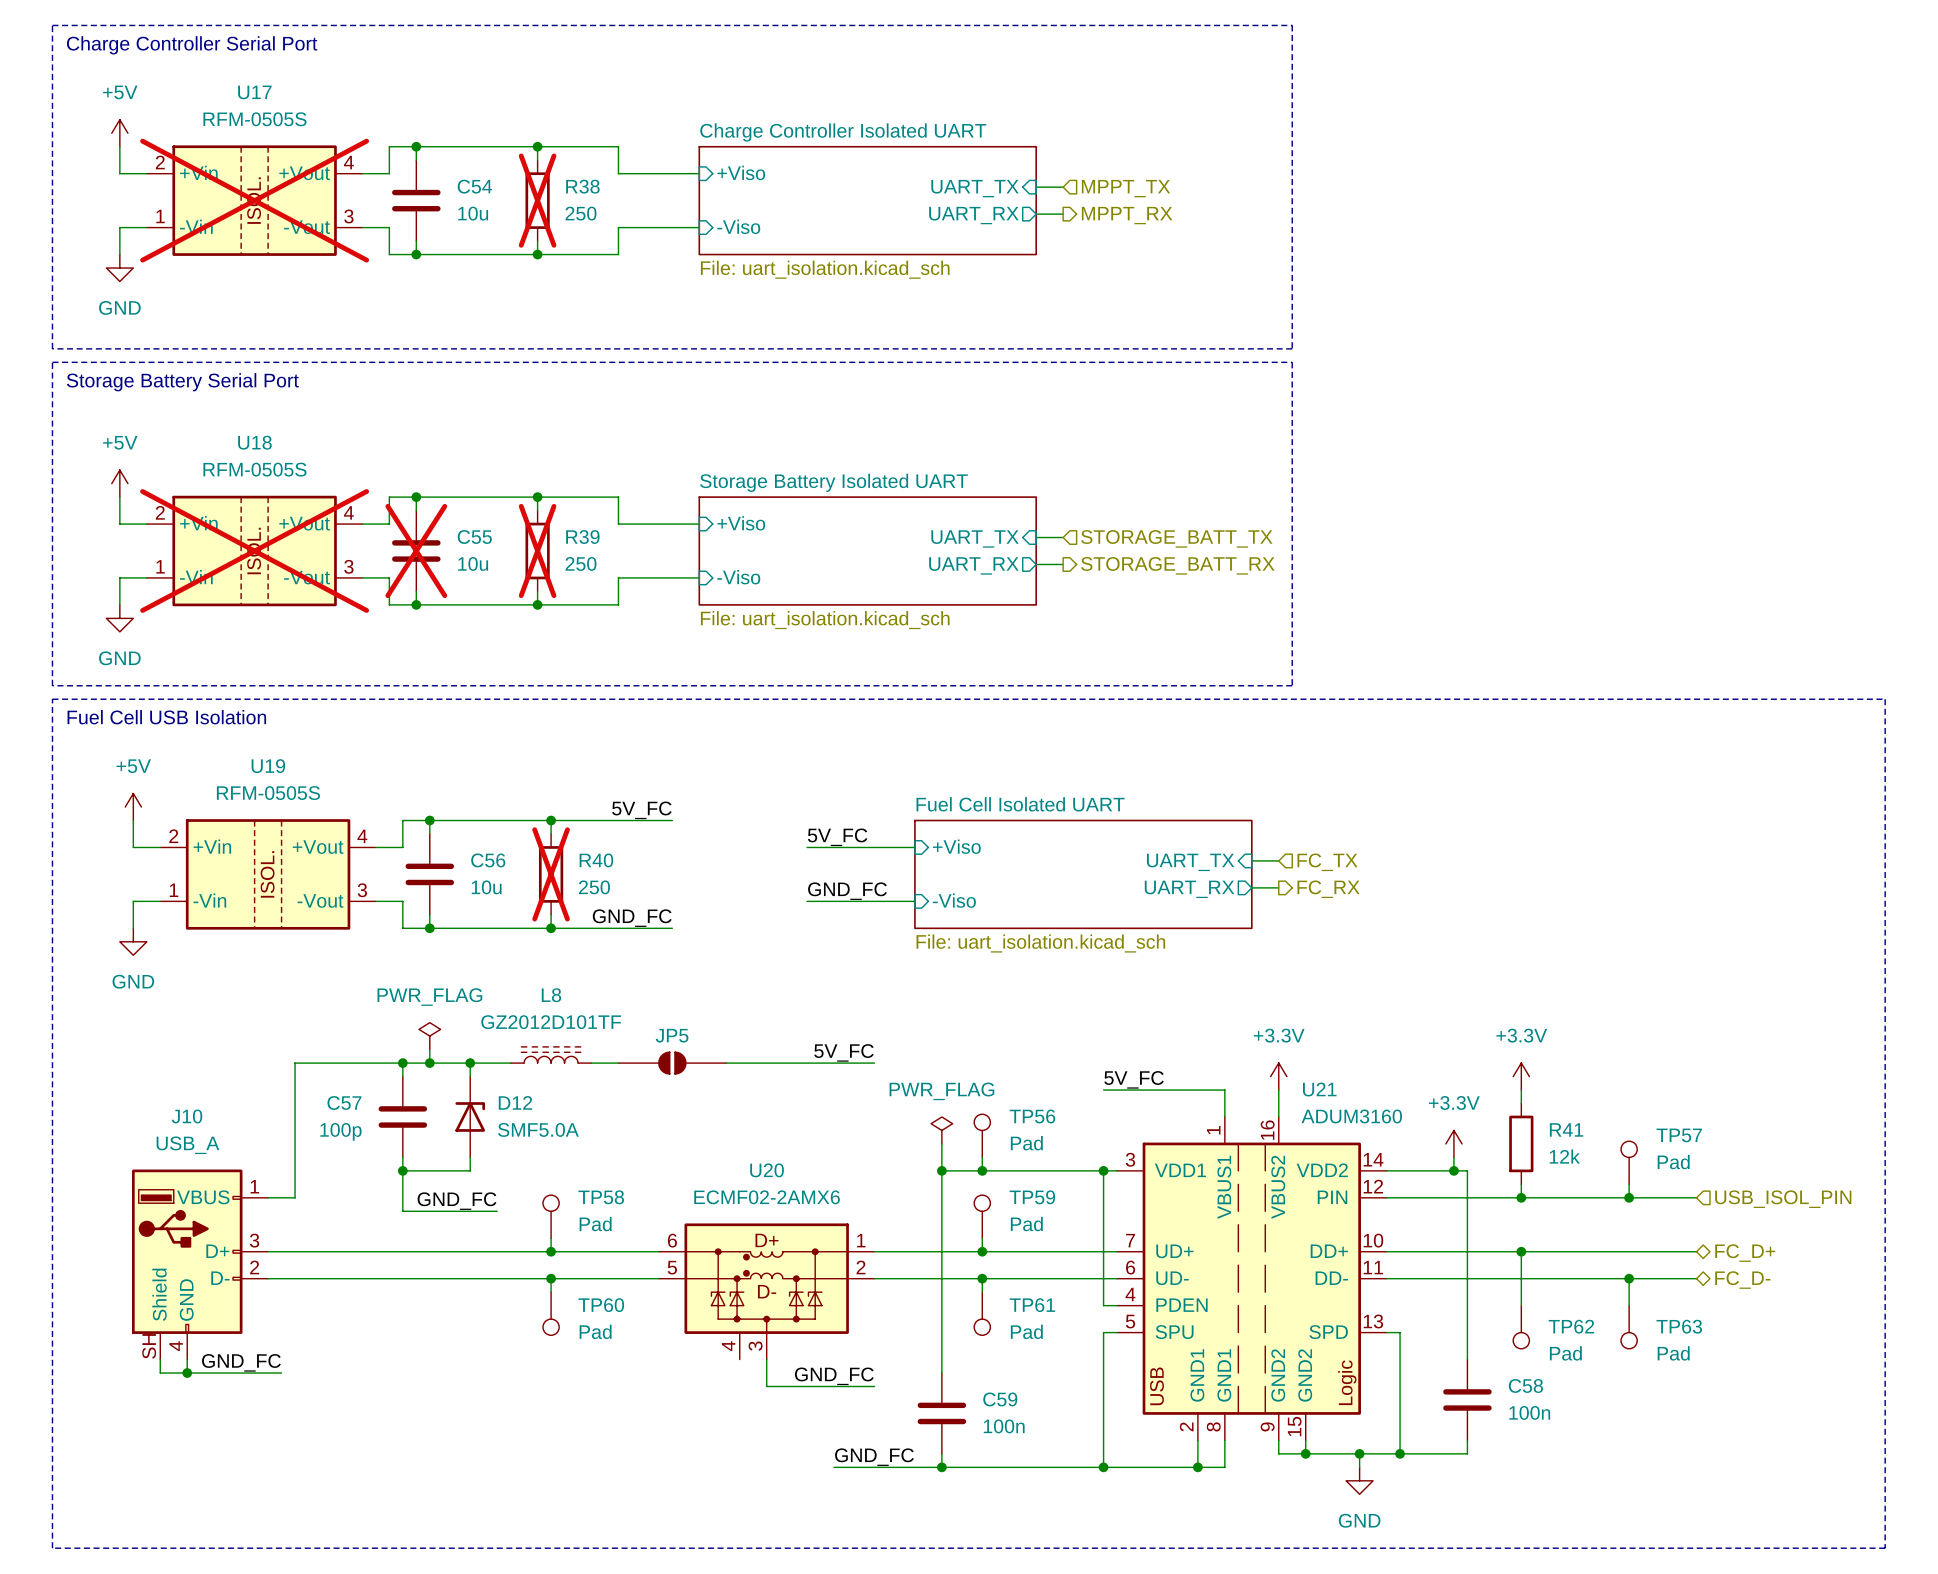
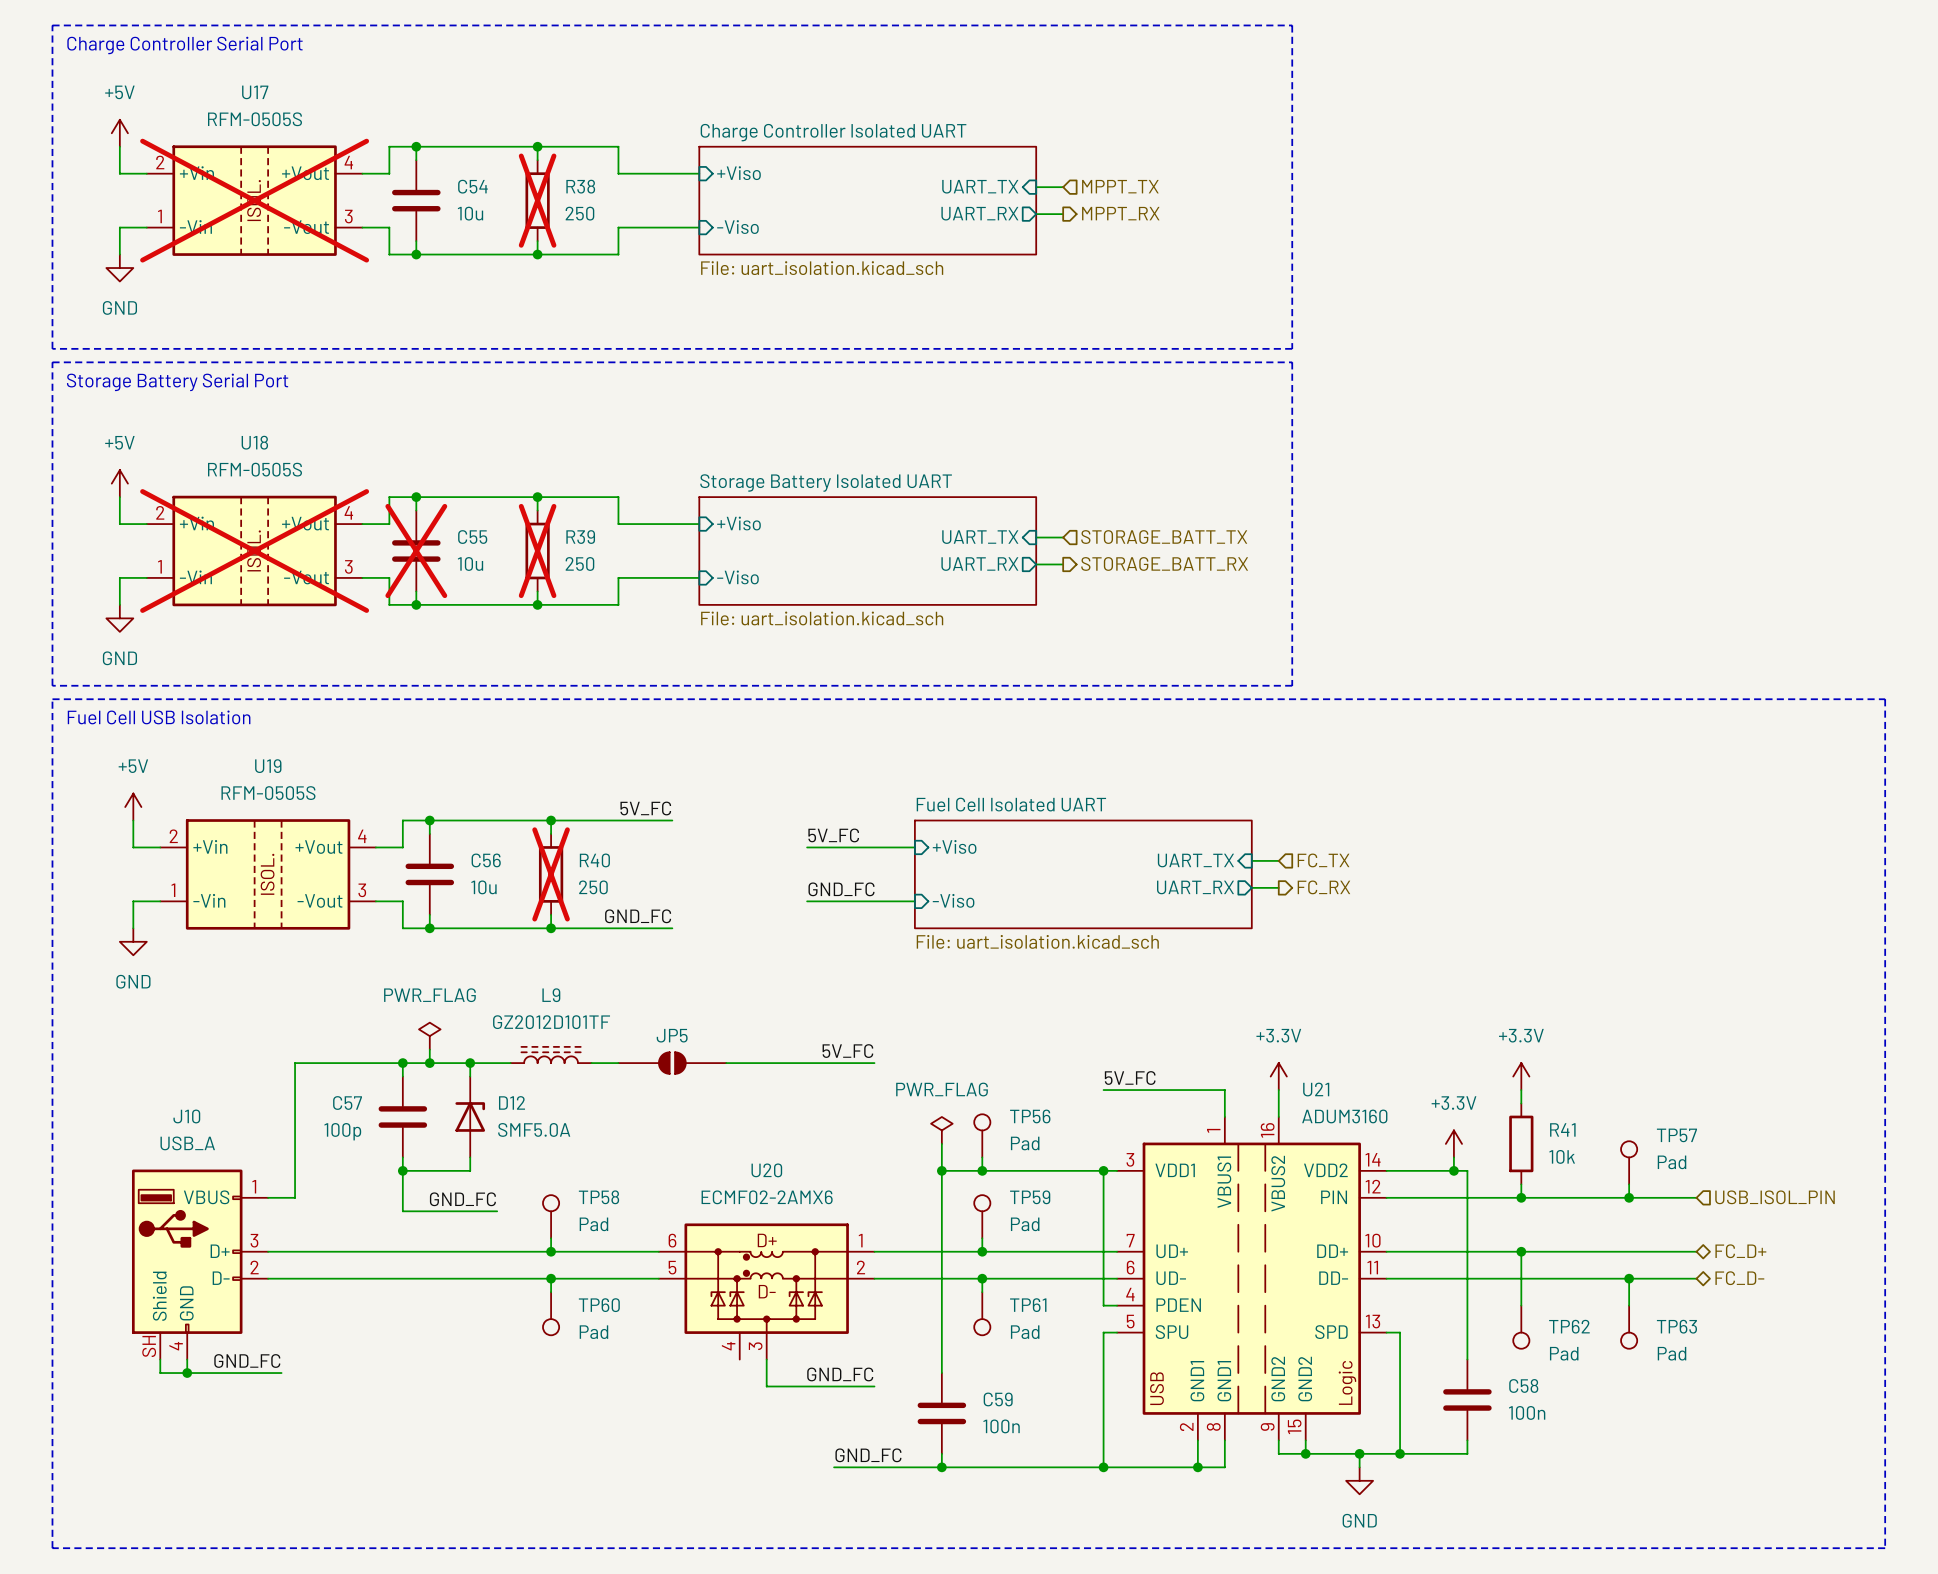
L8 name: L8 (551, 995) -> L9 (551, 995)
R41 value: 12k (1564, 1156) -> 10k (1562, 1156)

